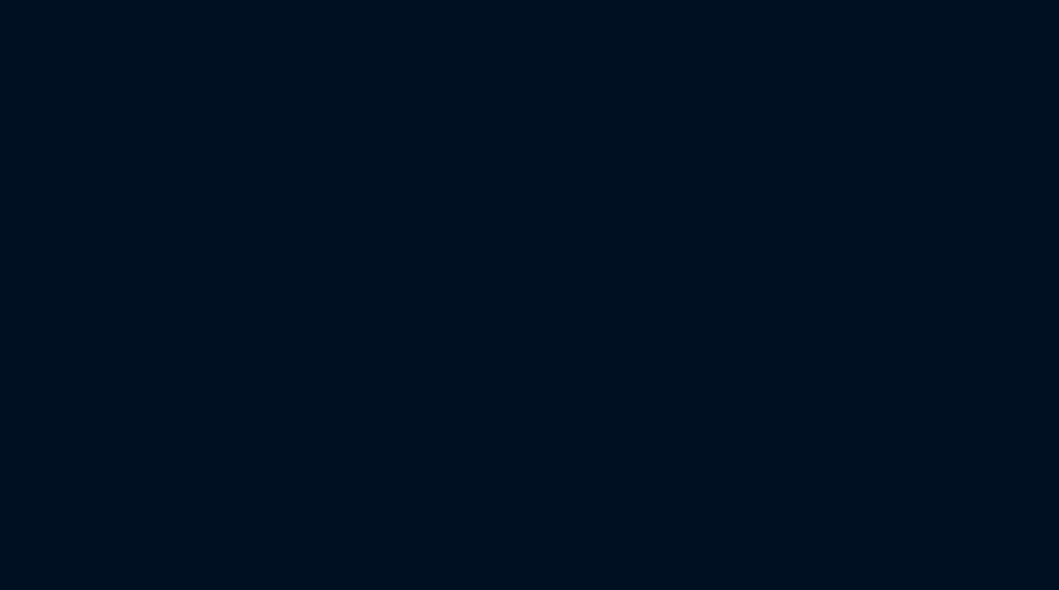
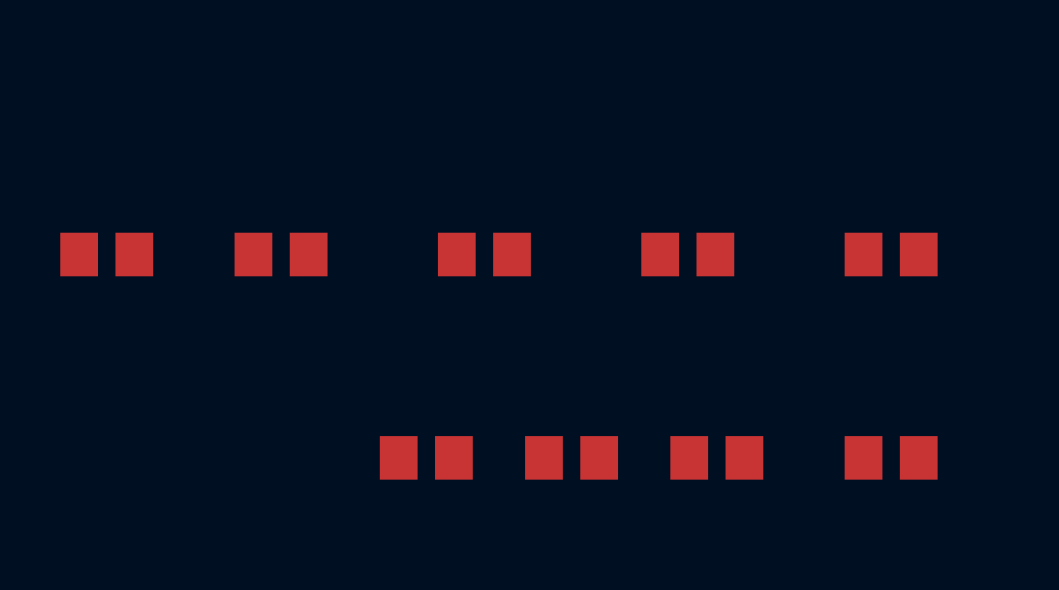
part: none -> (106, 254)
part: none -> (281, 254)
part: none -> (484, 254)
part: none -> (687, 254)
part: none -> (891, 254)
part: none -> (426, 457)
part: none -> (571, 457)
part: none -> (716, 457)
part: none -> (891, 457)

